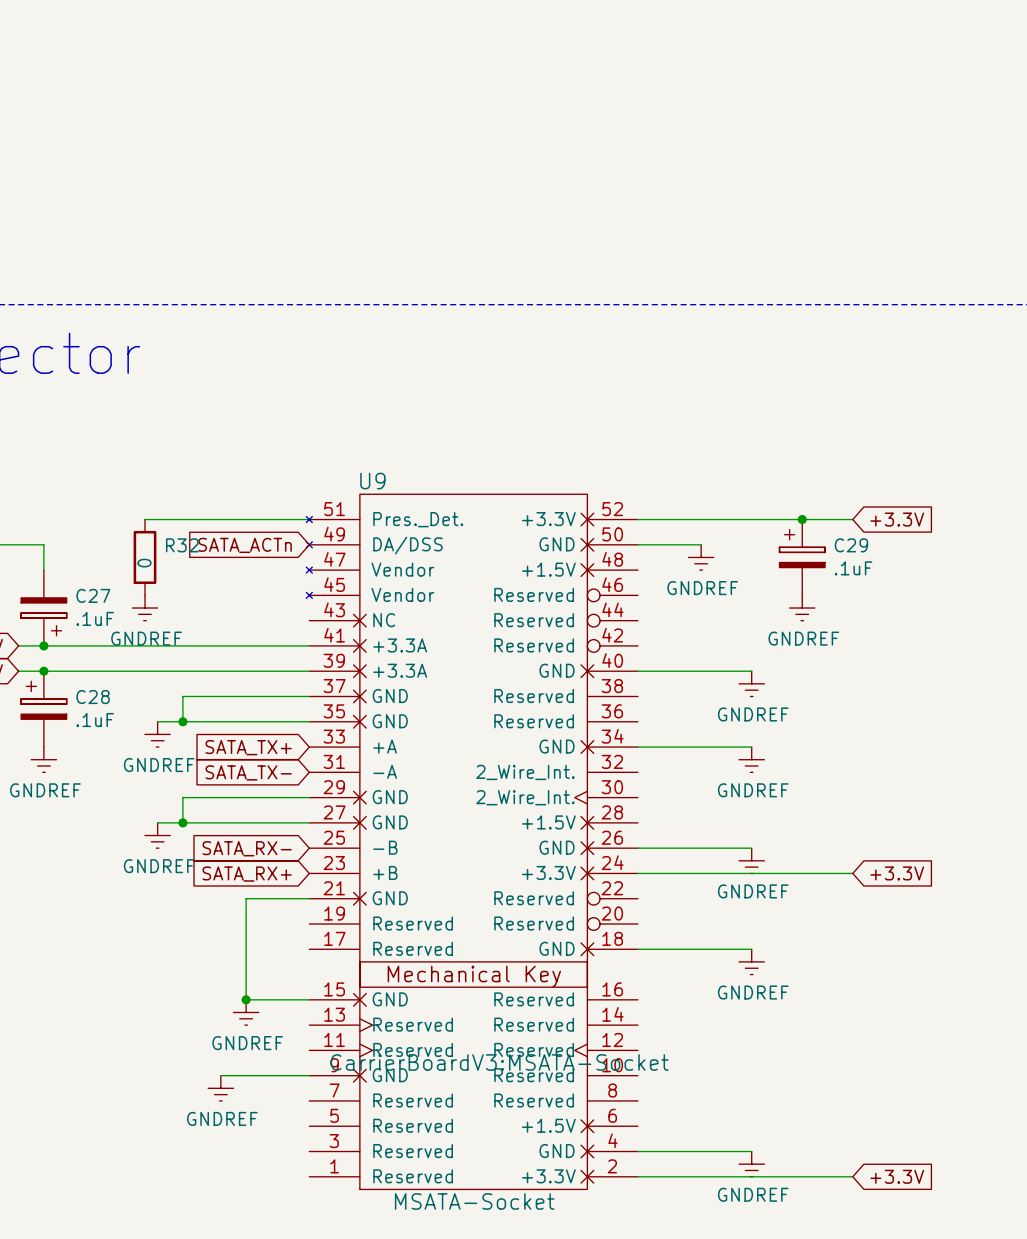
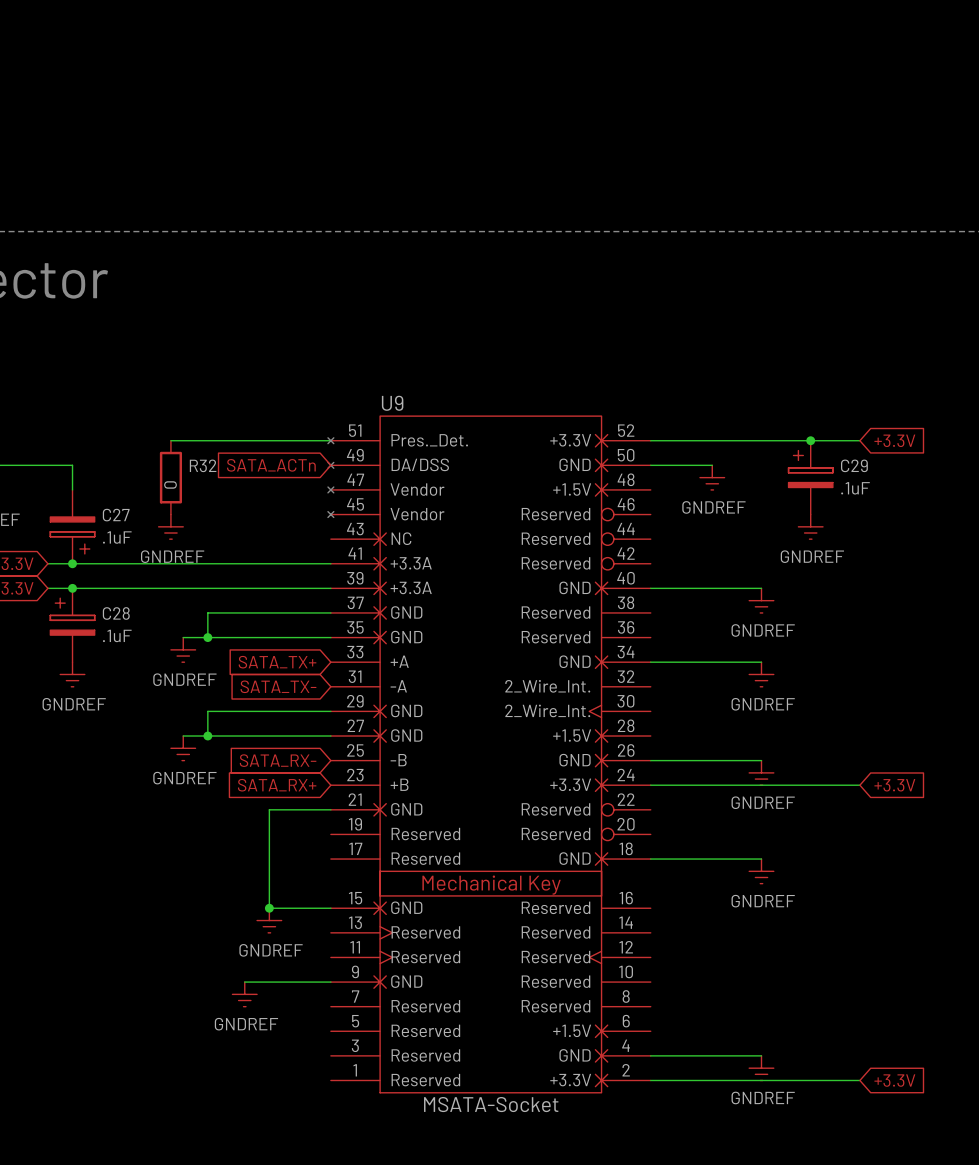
U9 text: CarrierBoardV3:MSATA-Socket (499, 1062) -> none

